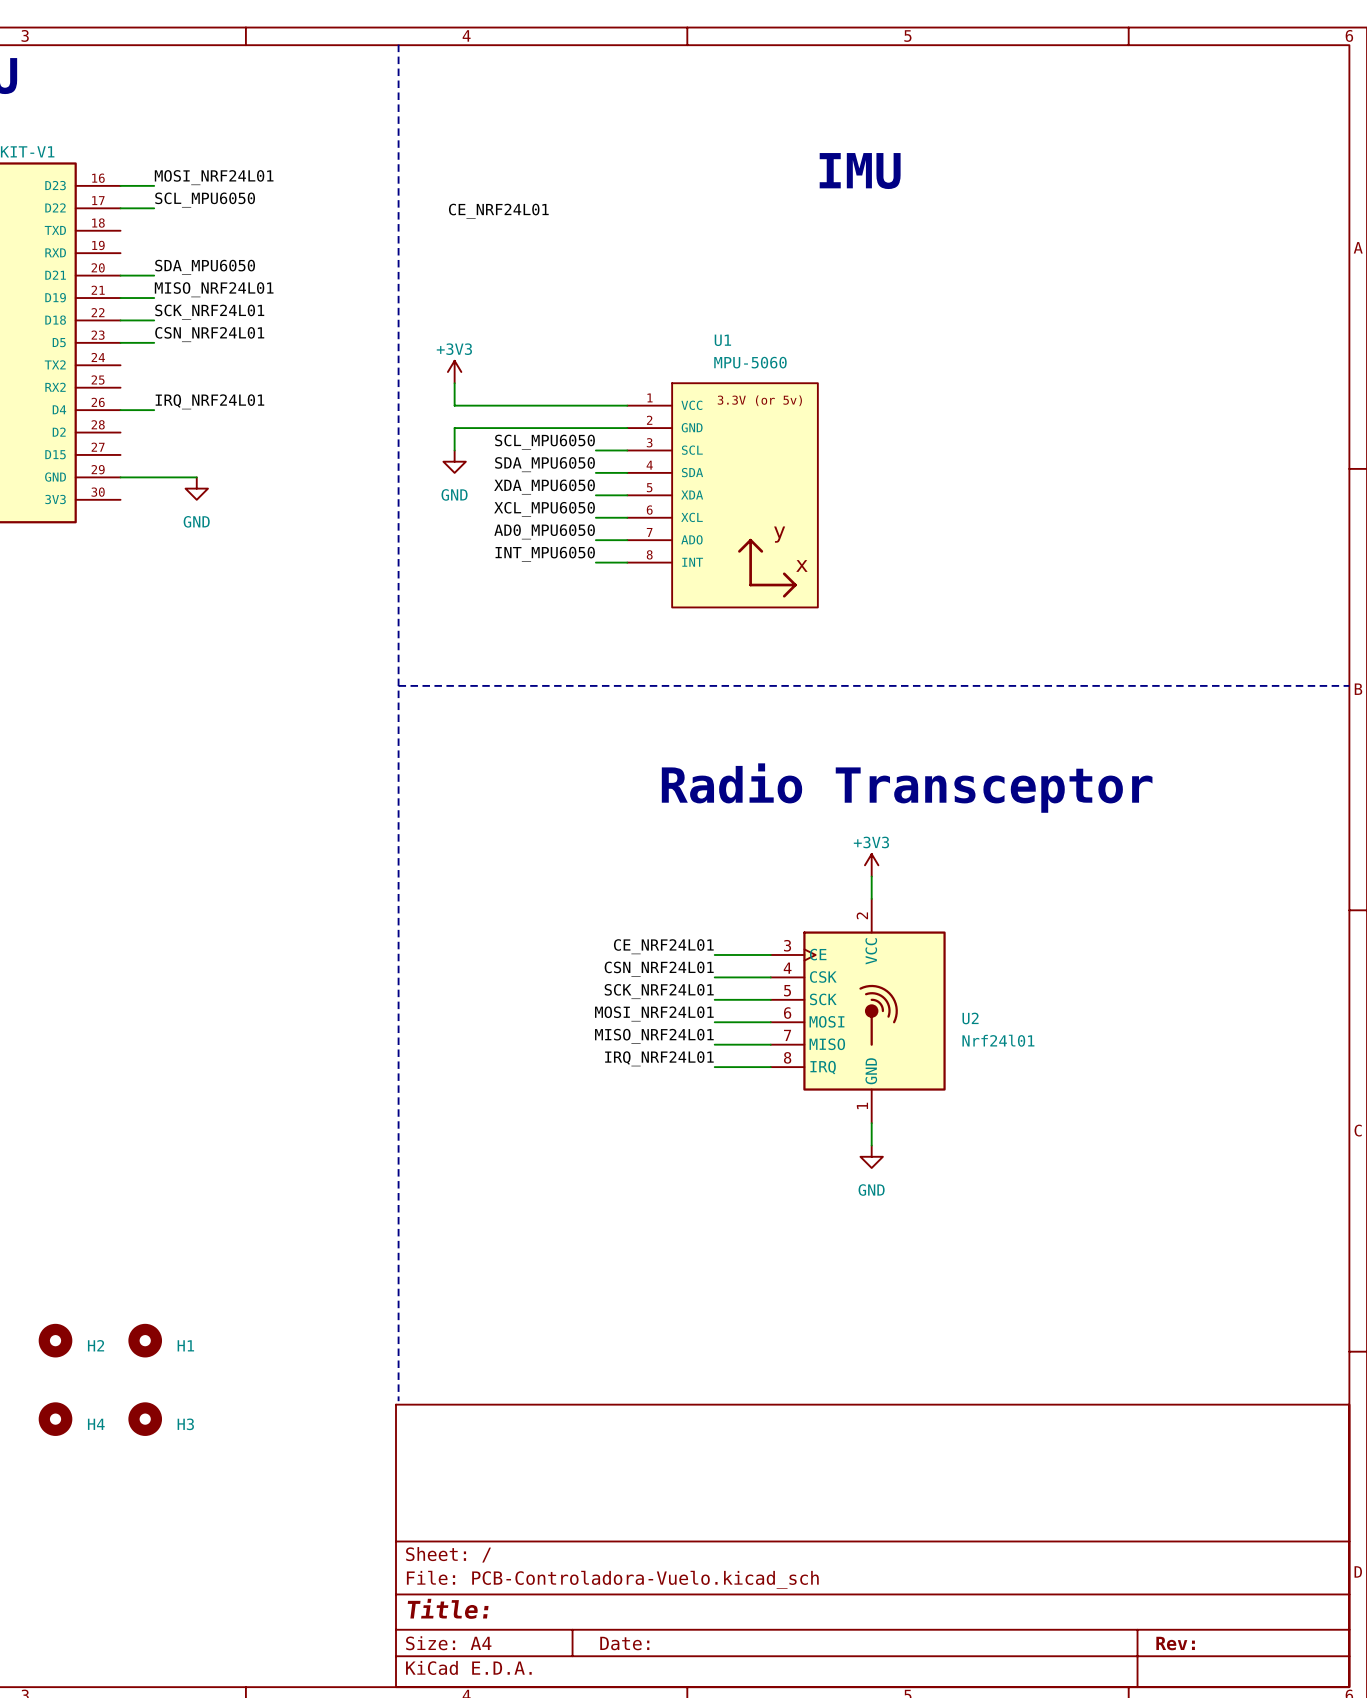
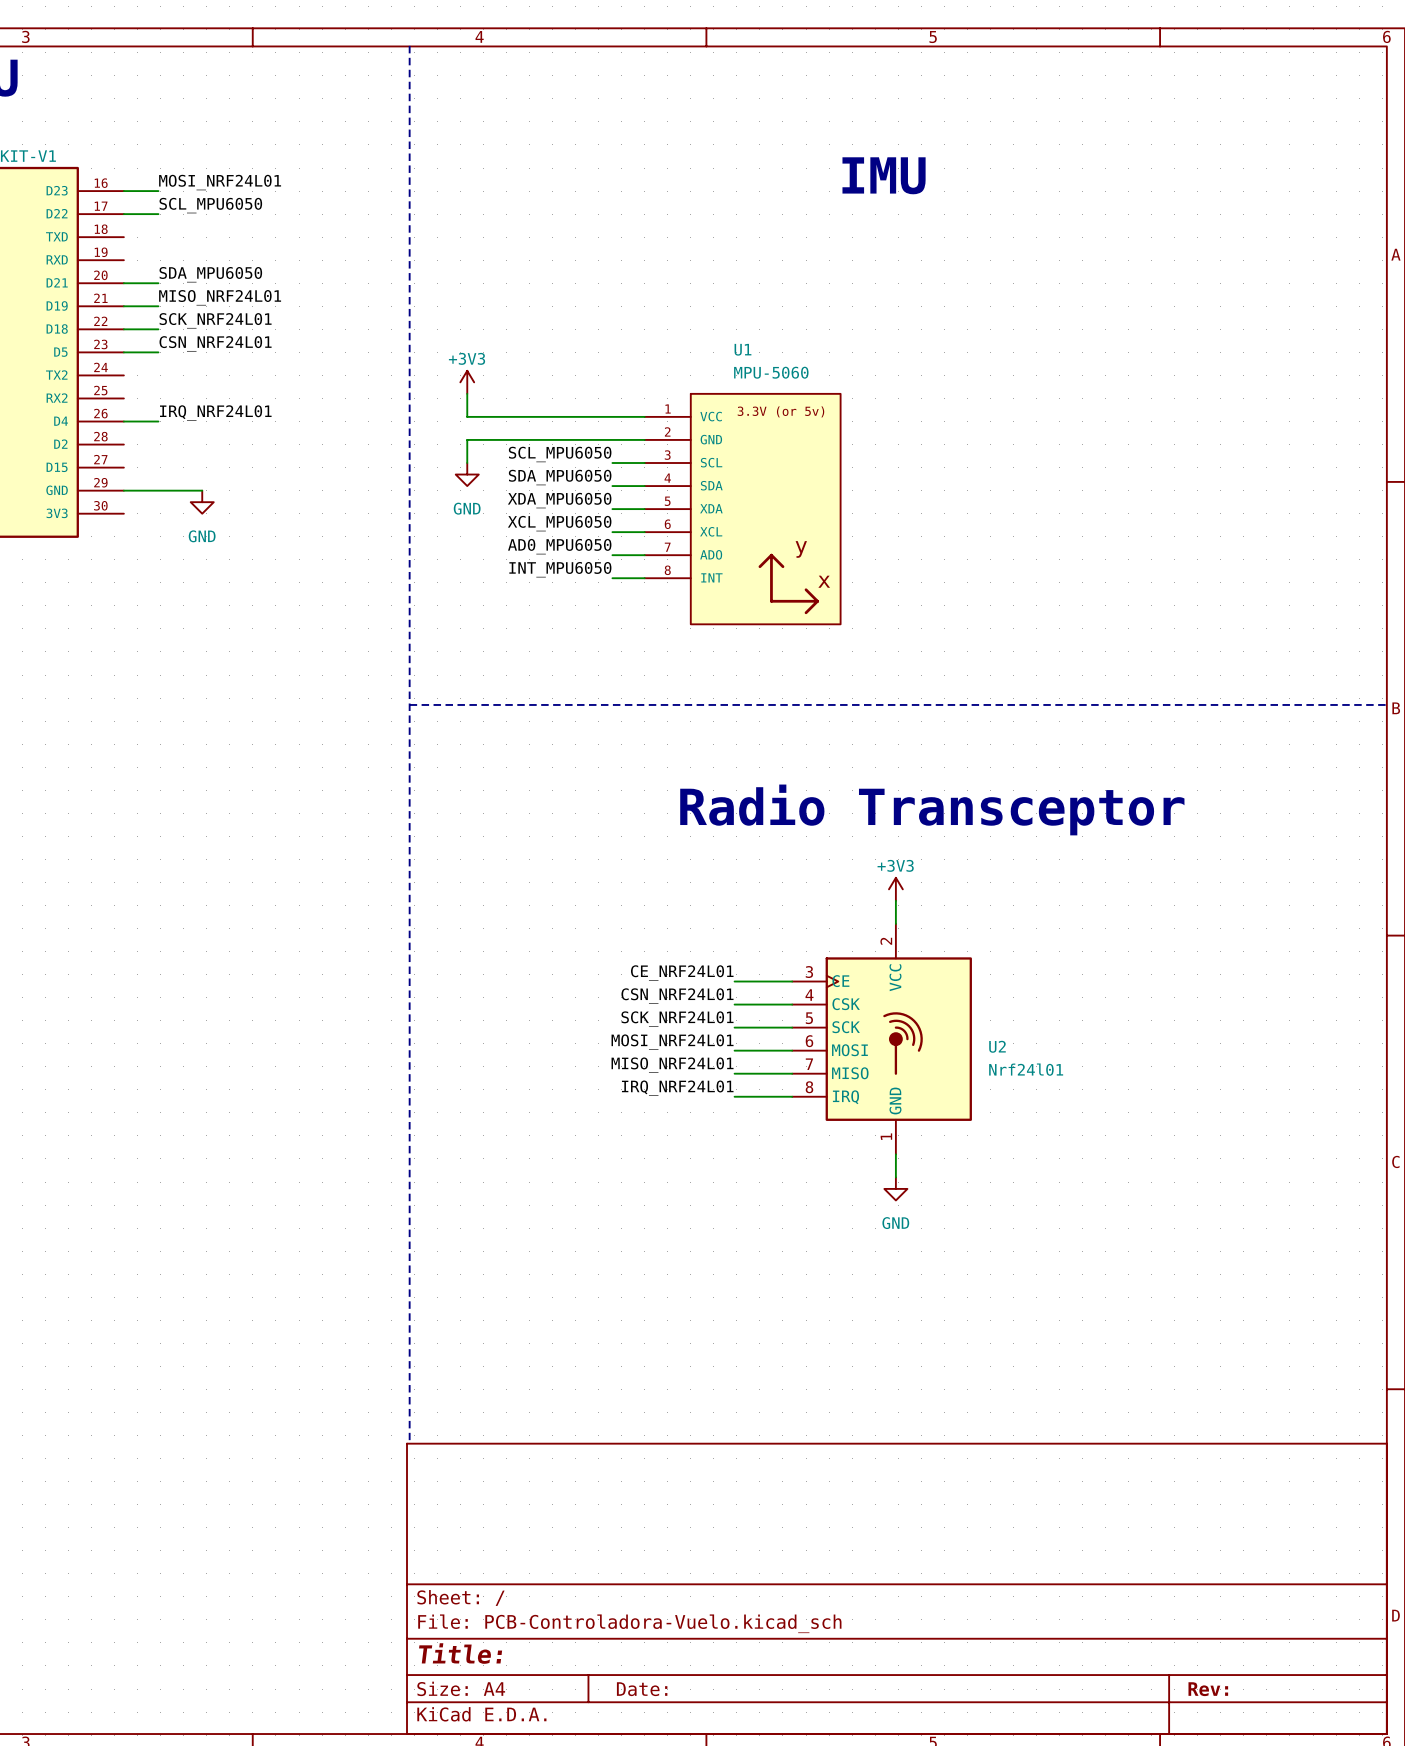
label: CE_NRF24L01 (498, 211) -> none
H2: (55, 1340) -> none
H1: (145, 1340) -> none
H4: (55, 1419) -> none
H3: (145, 1419) -> none

